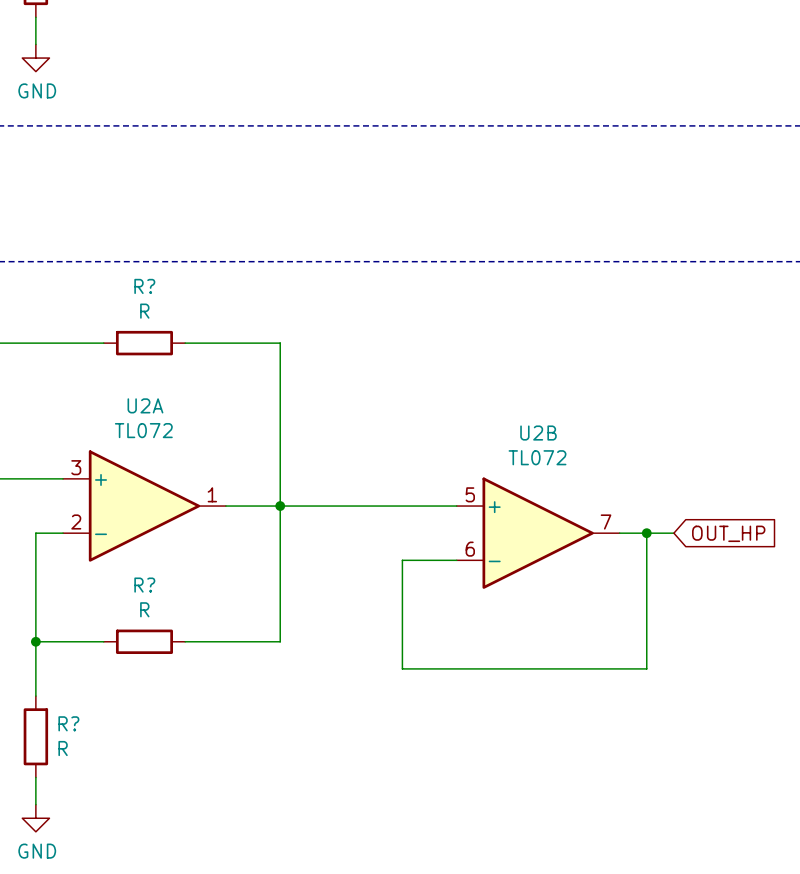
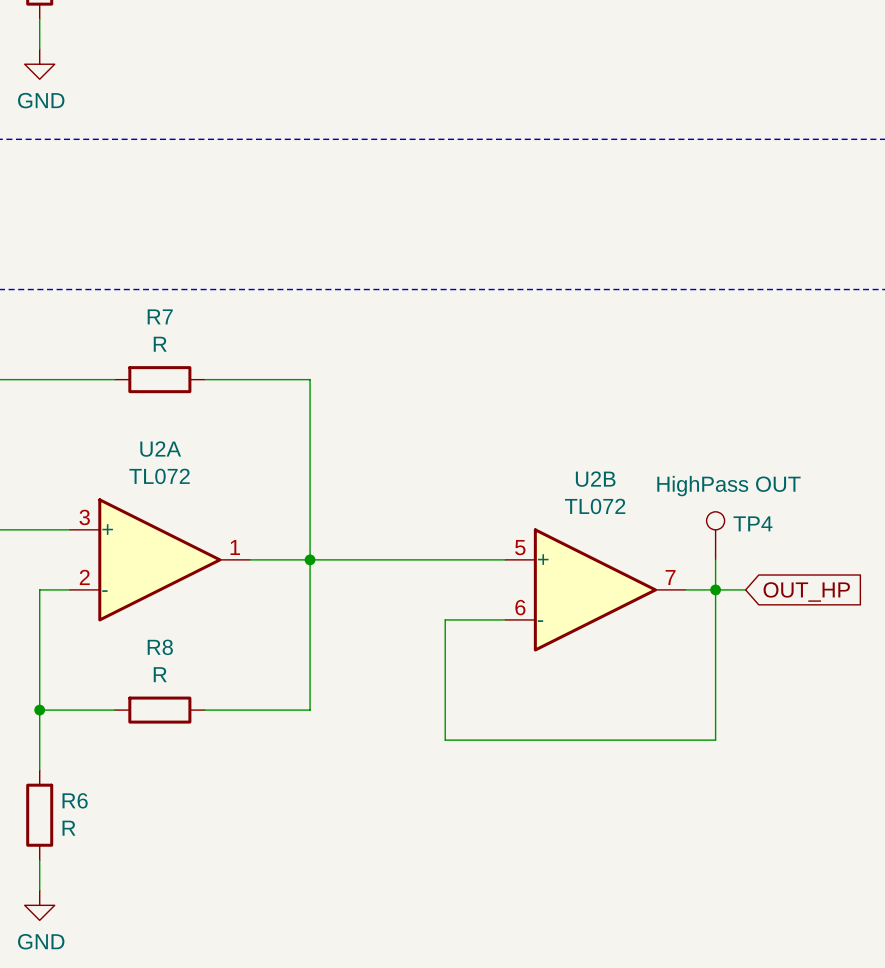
R? name: R? (144, 286) -> R7 (160, 316)
TP4: none -> HighPass OUT (715, 535)
wire: none -> (715, 559) (715, 589)
R? name: R? (144, 585) -> R8 (160, 647)
R? name: R? (68, 723) -> R6 (75, 800)

